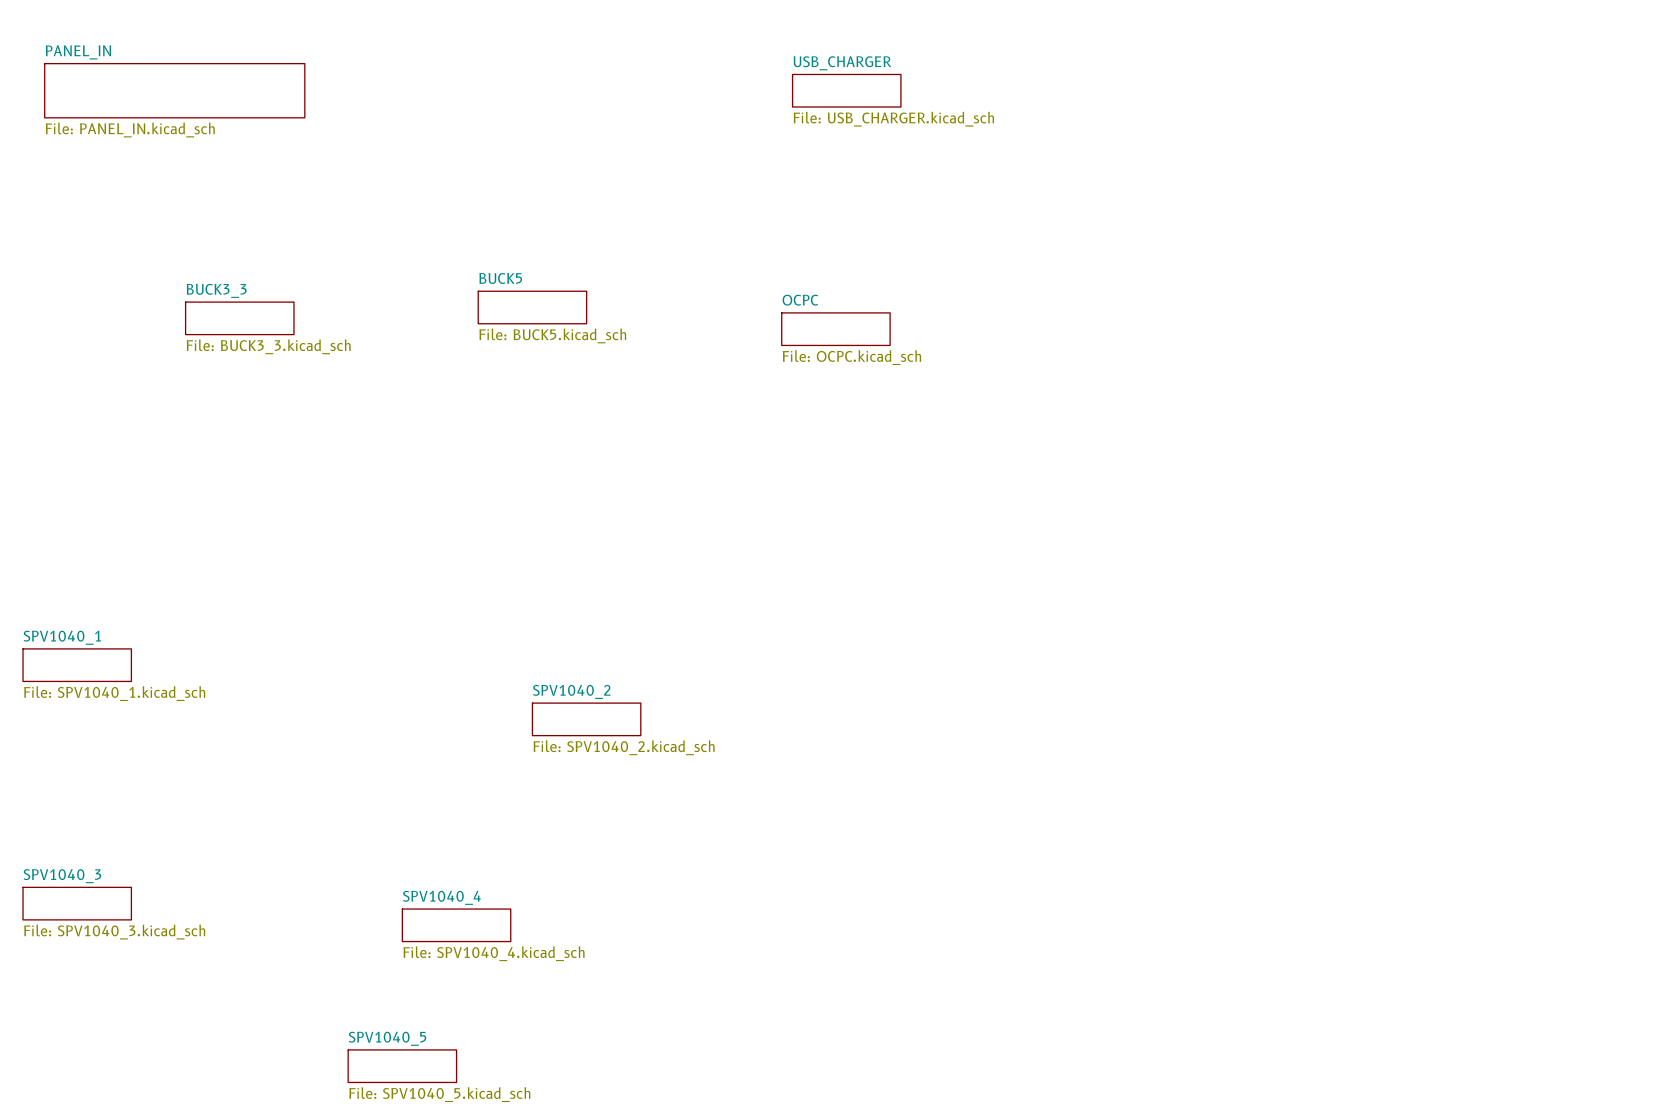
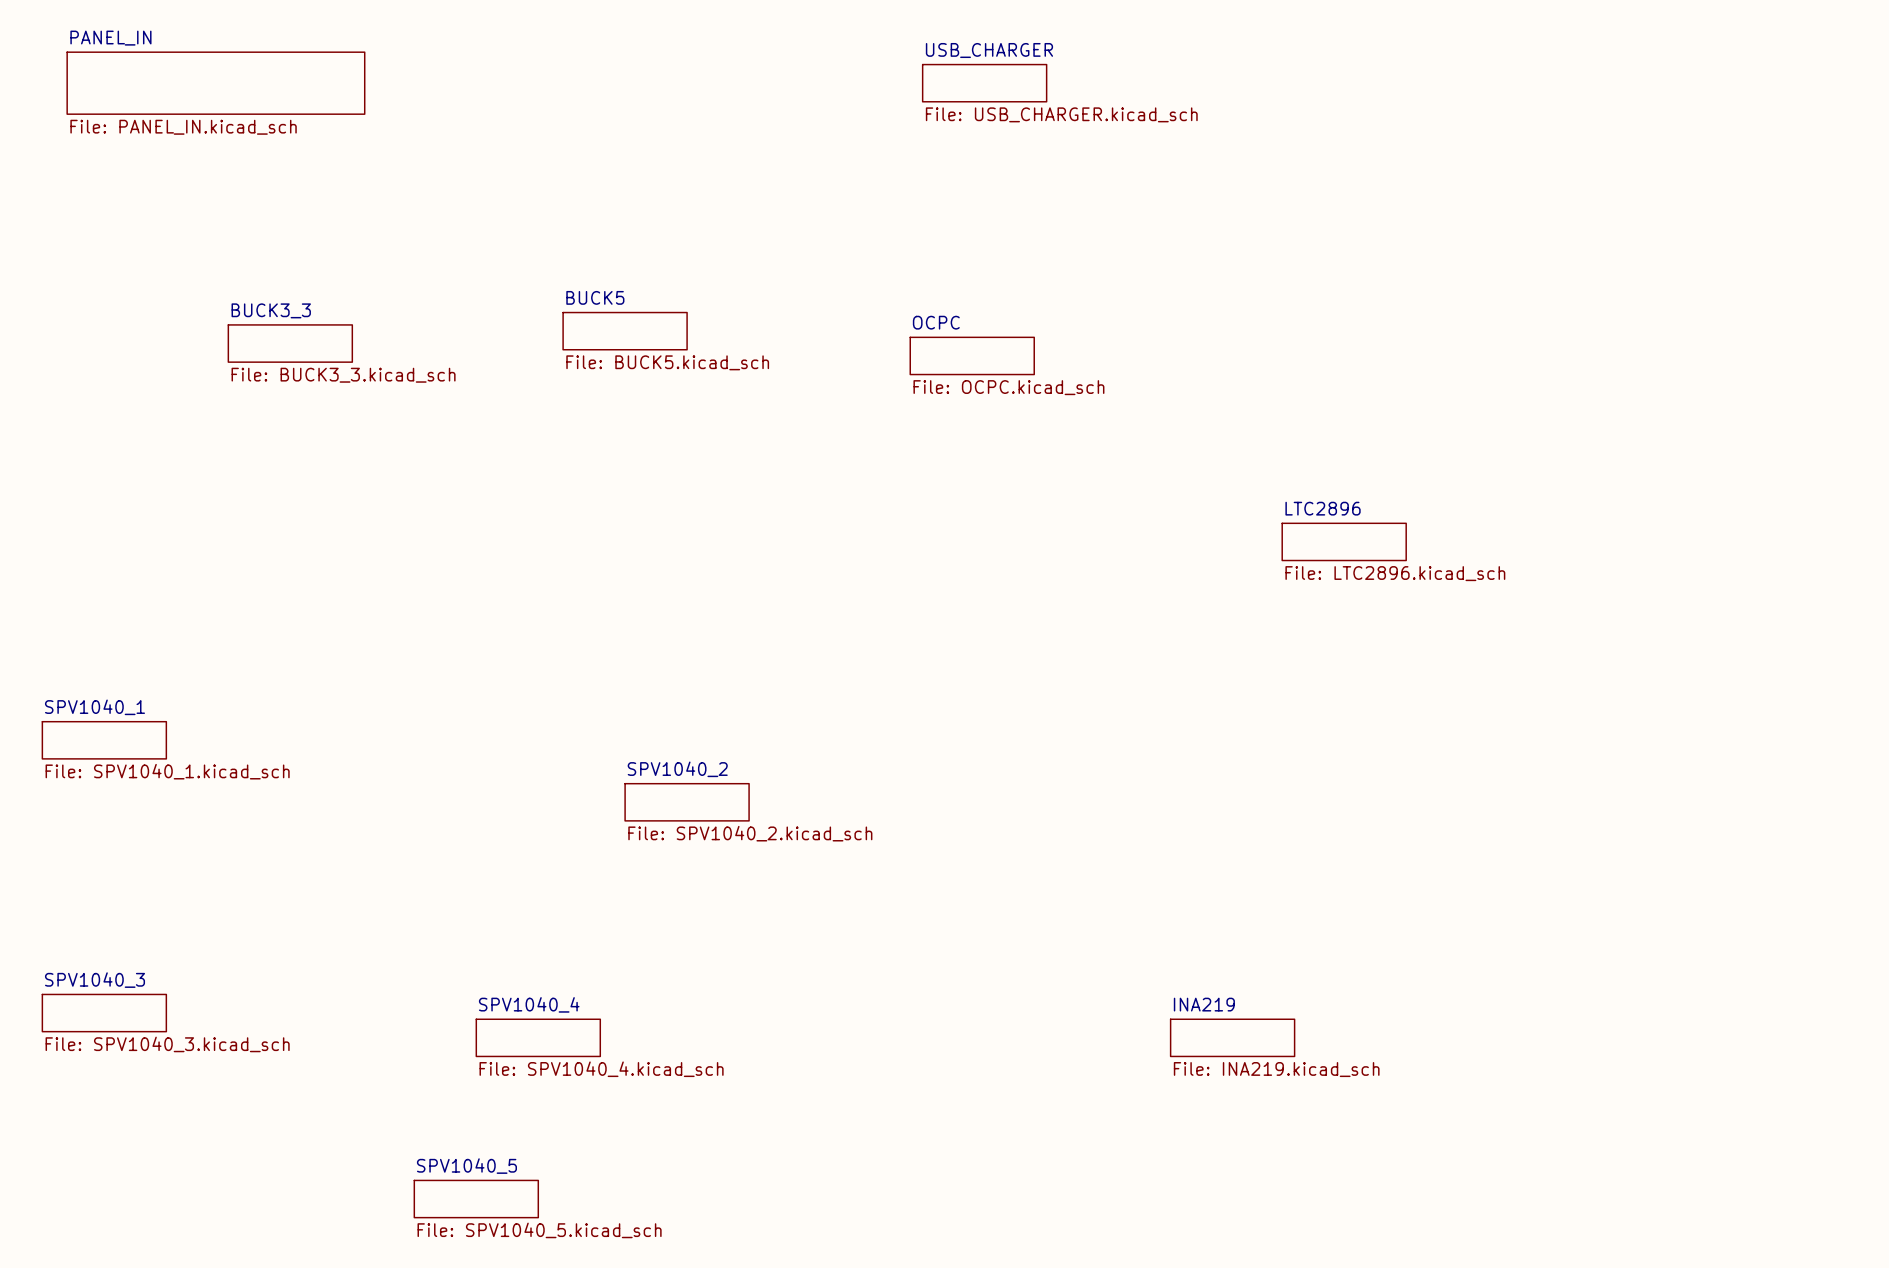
sheet LTC2896: none -> File: LTC2896.kicad_sch (1344, 541)
sheet INA219: none -> File: INA219.kicad_sch (1232, 1037)

